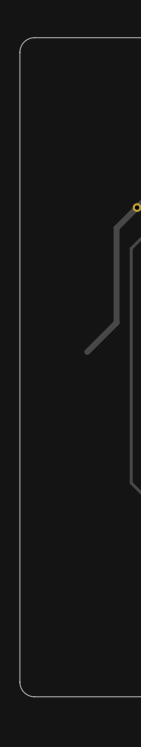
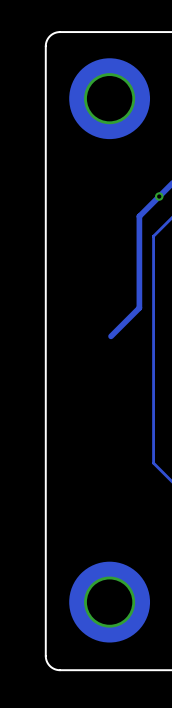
part: none -> (109, 98)
part: none -> (109, 602)

